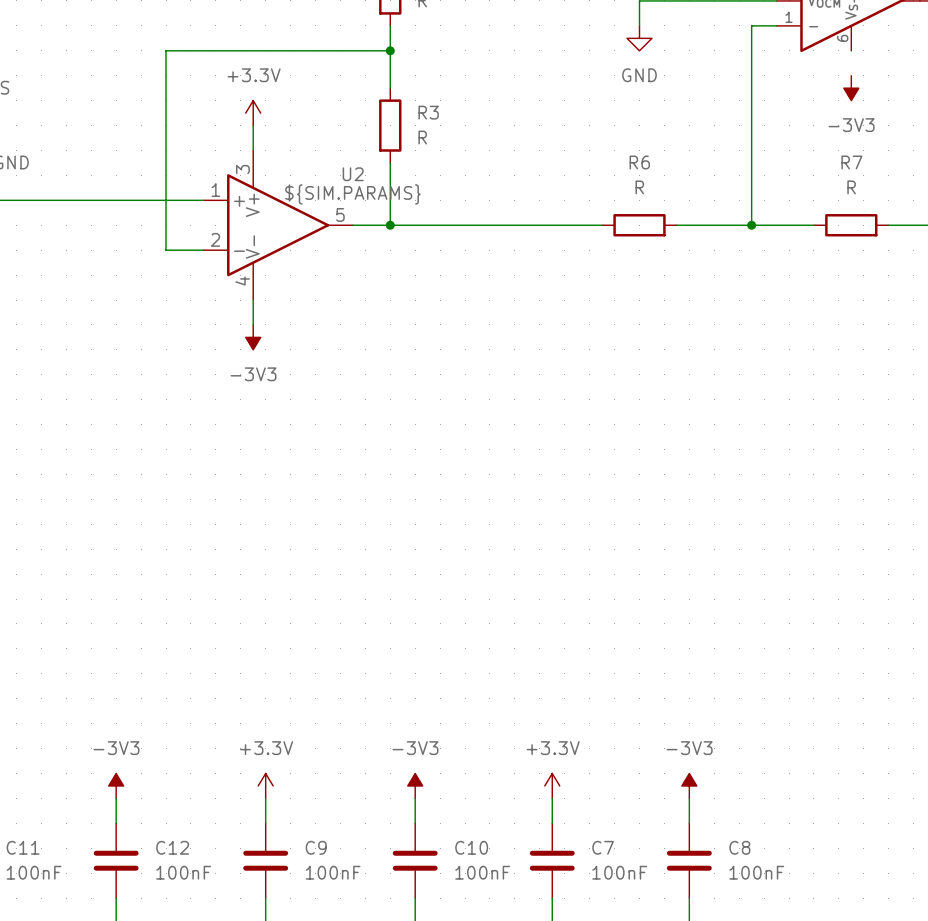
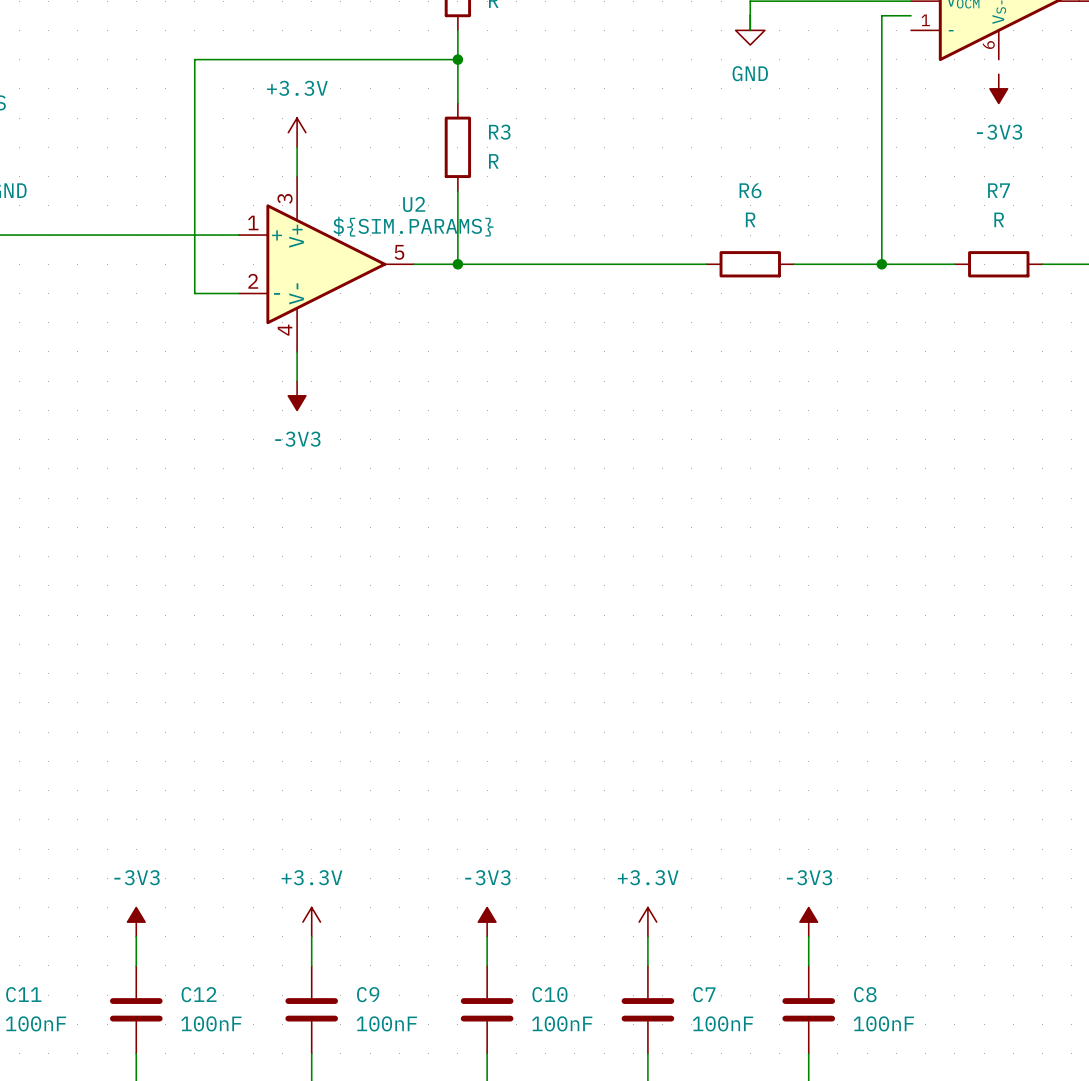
wire: (751, 25) (776, 25) -> (881, 30) (881, 15) (911, 15)
power symbol position: GND (639, 38) -> GND (750, 30)
power symbol position: -3V3 (851, 88) -> -3V3 (998, 88)

